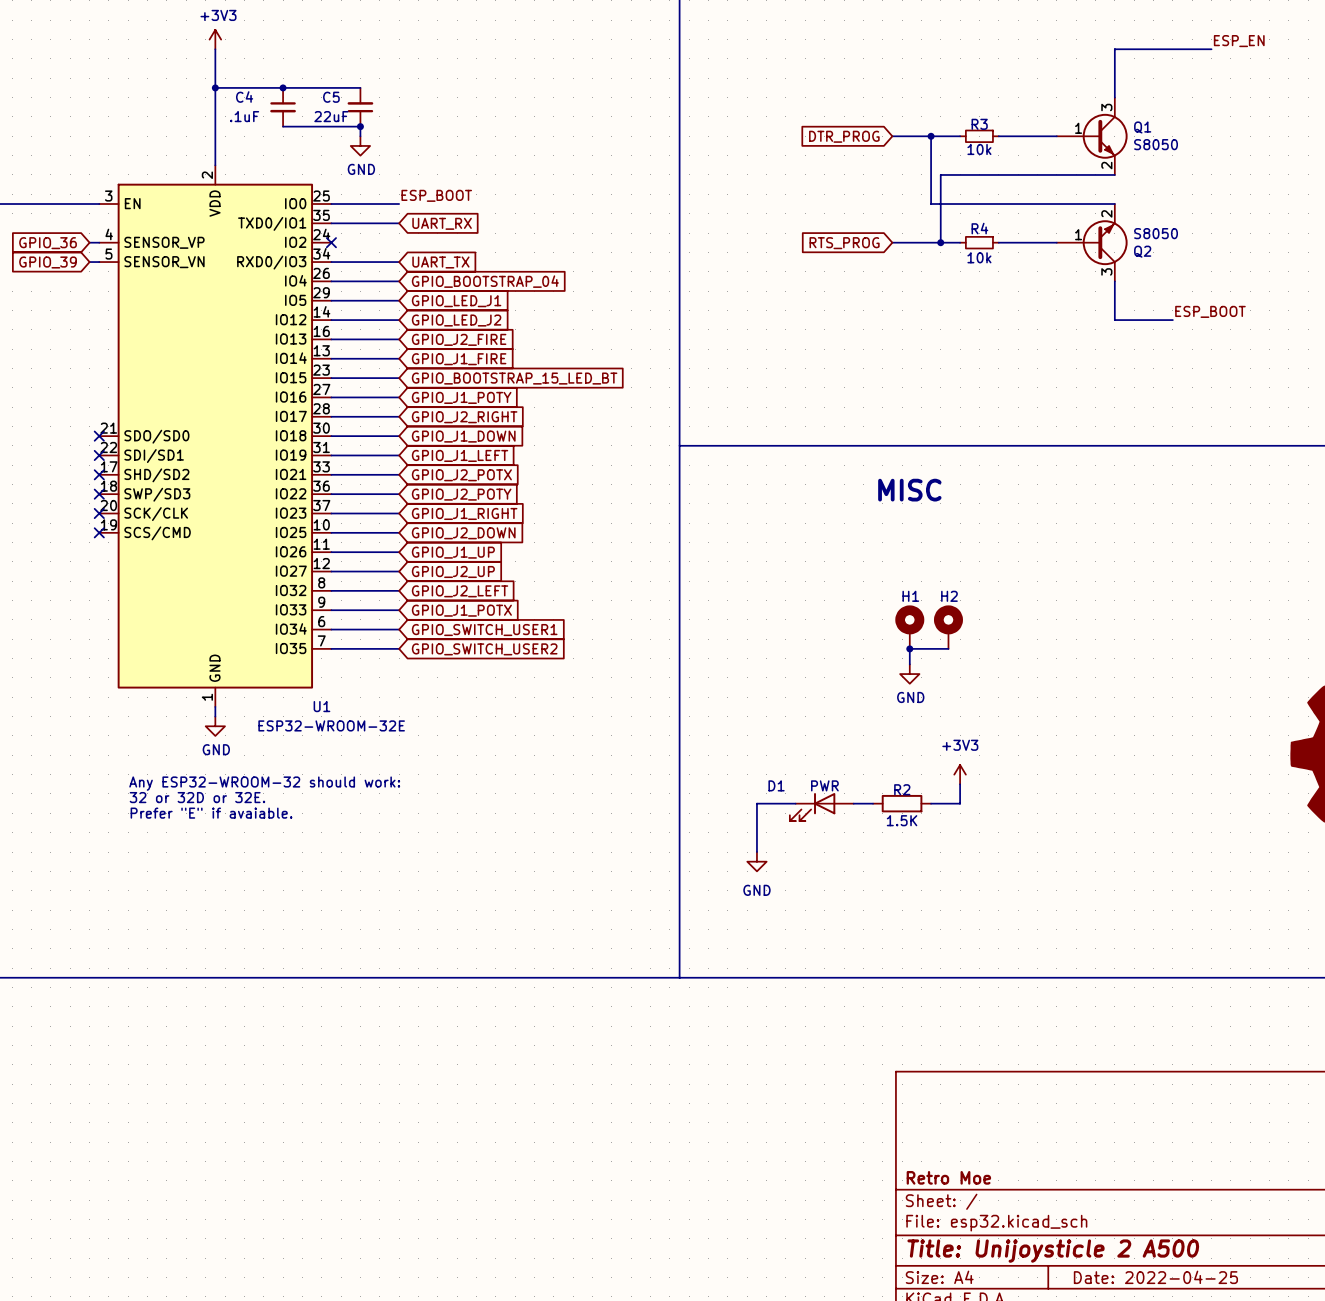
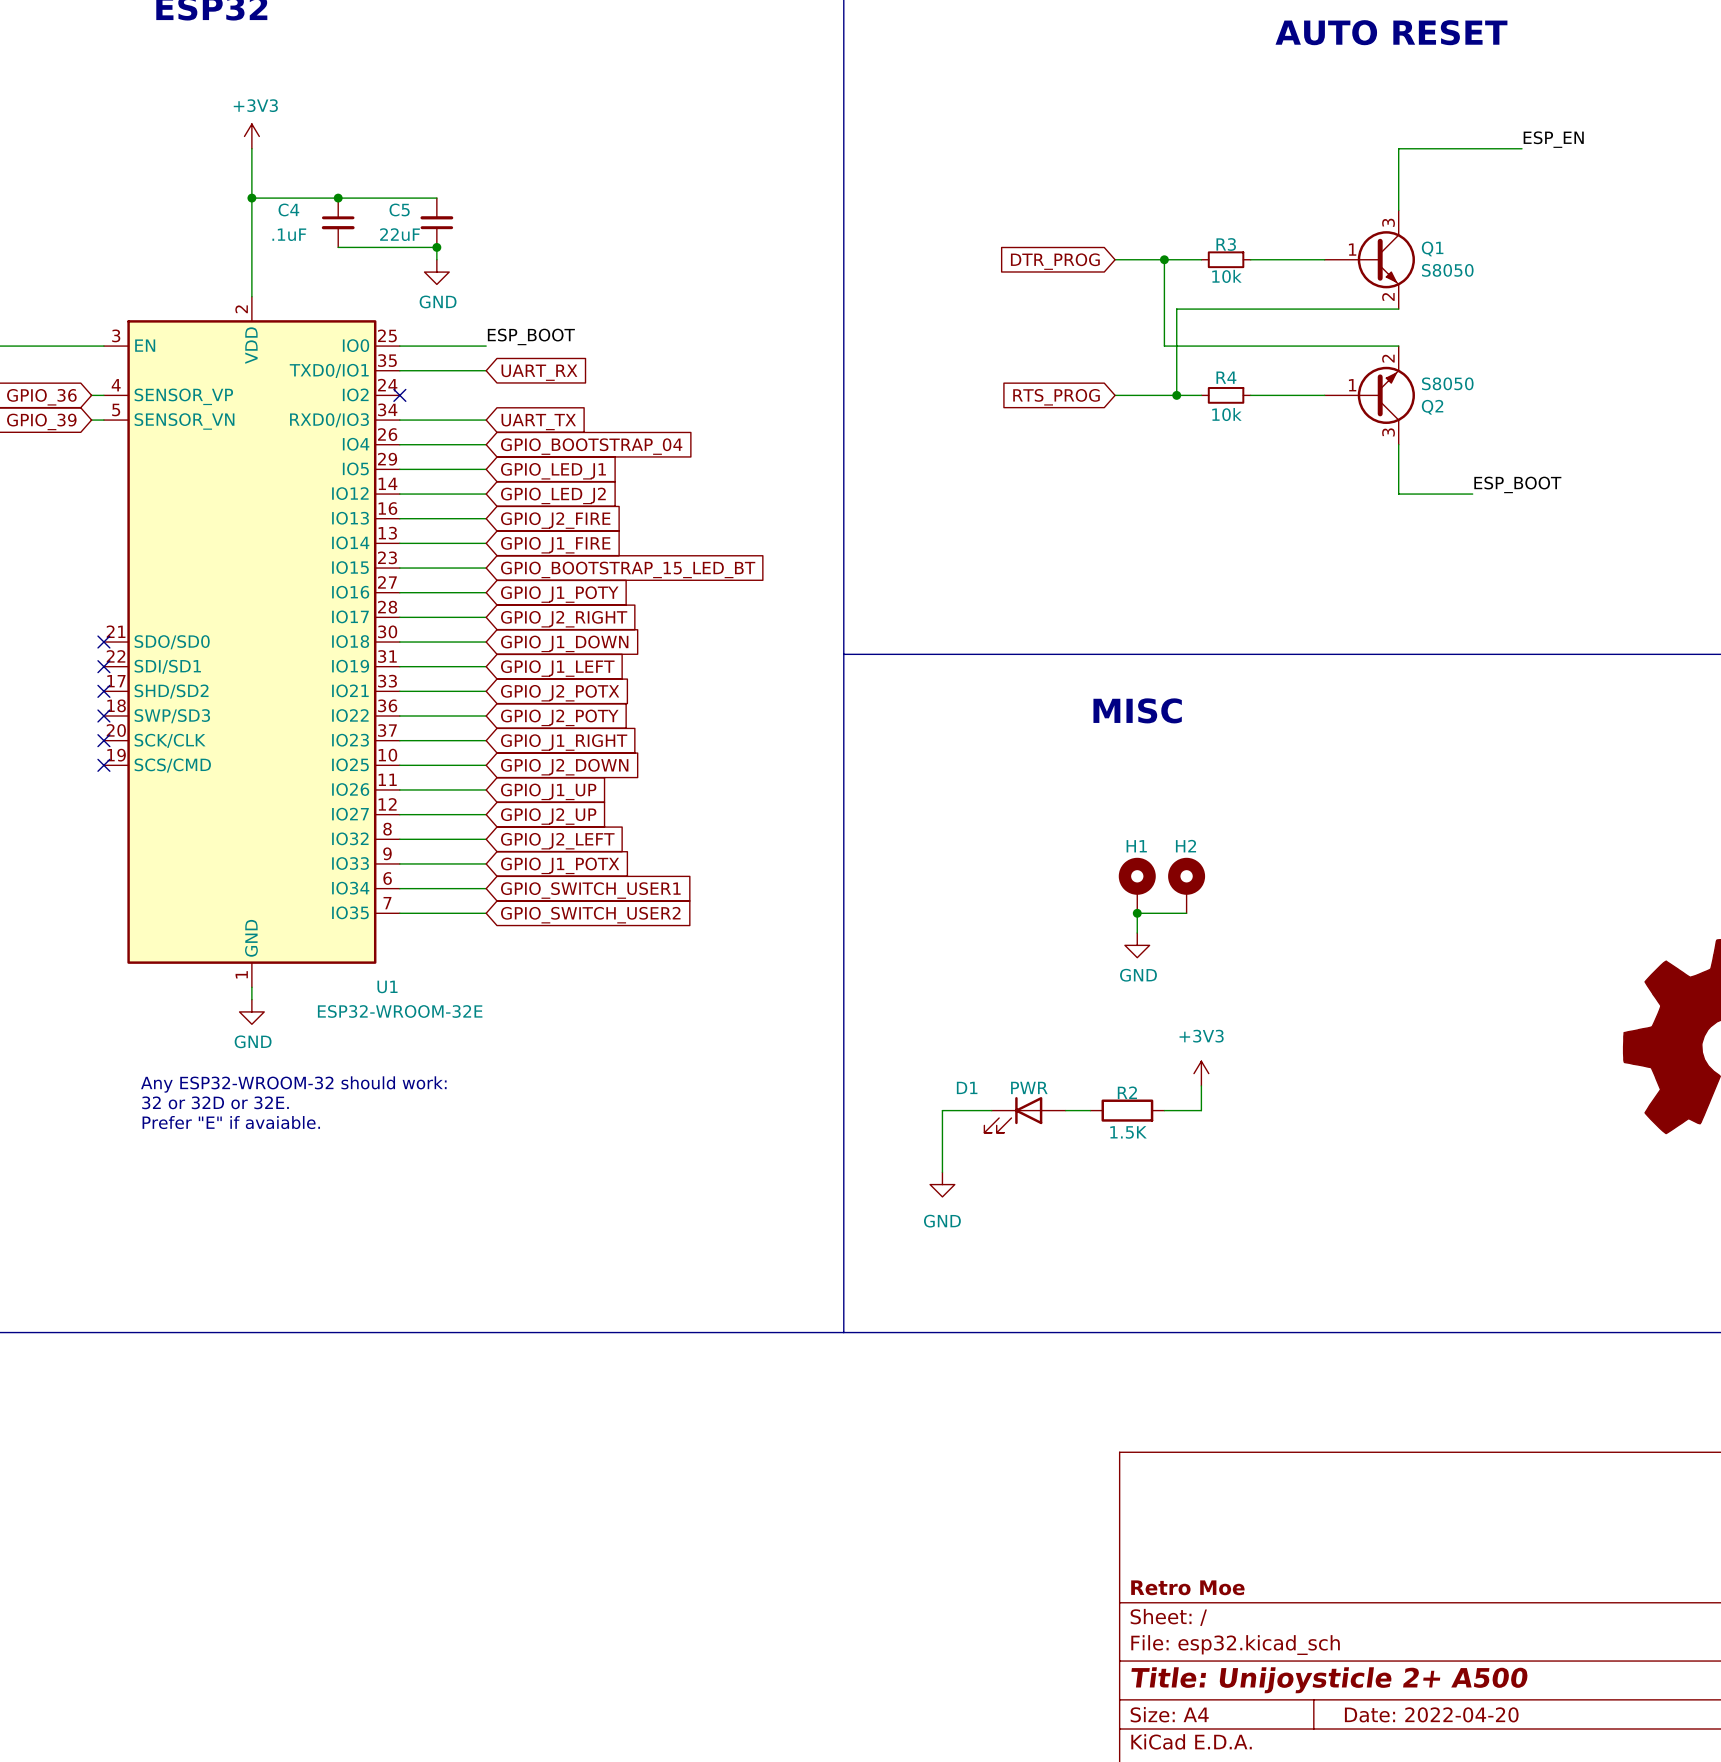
title block: Title: Unijoysticle 2 A500 (1053, 1251) -> Title: Unijoysticle 2+ A500 (1329, 1680)
title block: Date: 2022-04-25 (1155, 1277) -> Date: 2022-04-20 (1431, 1714)

